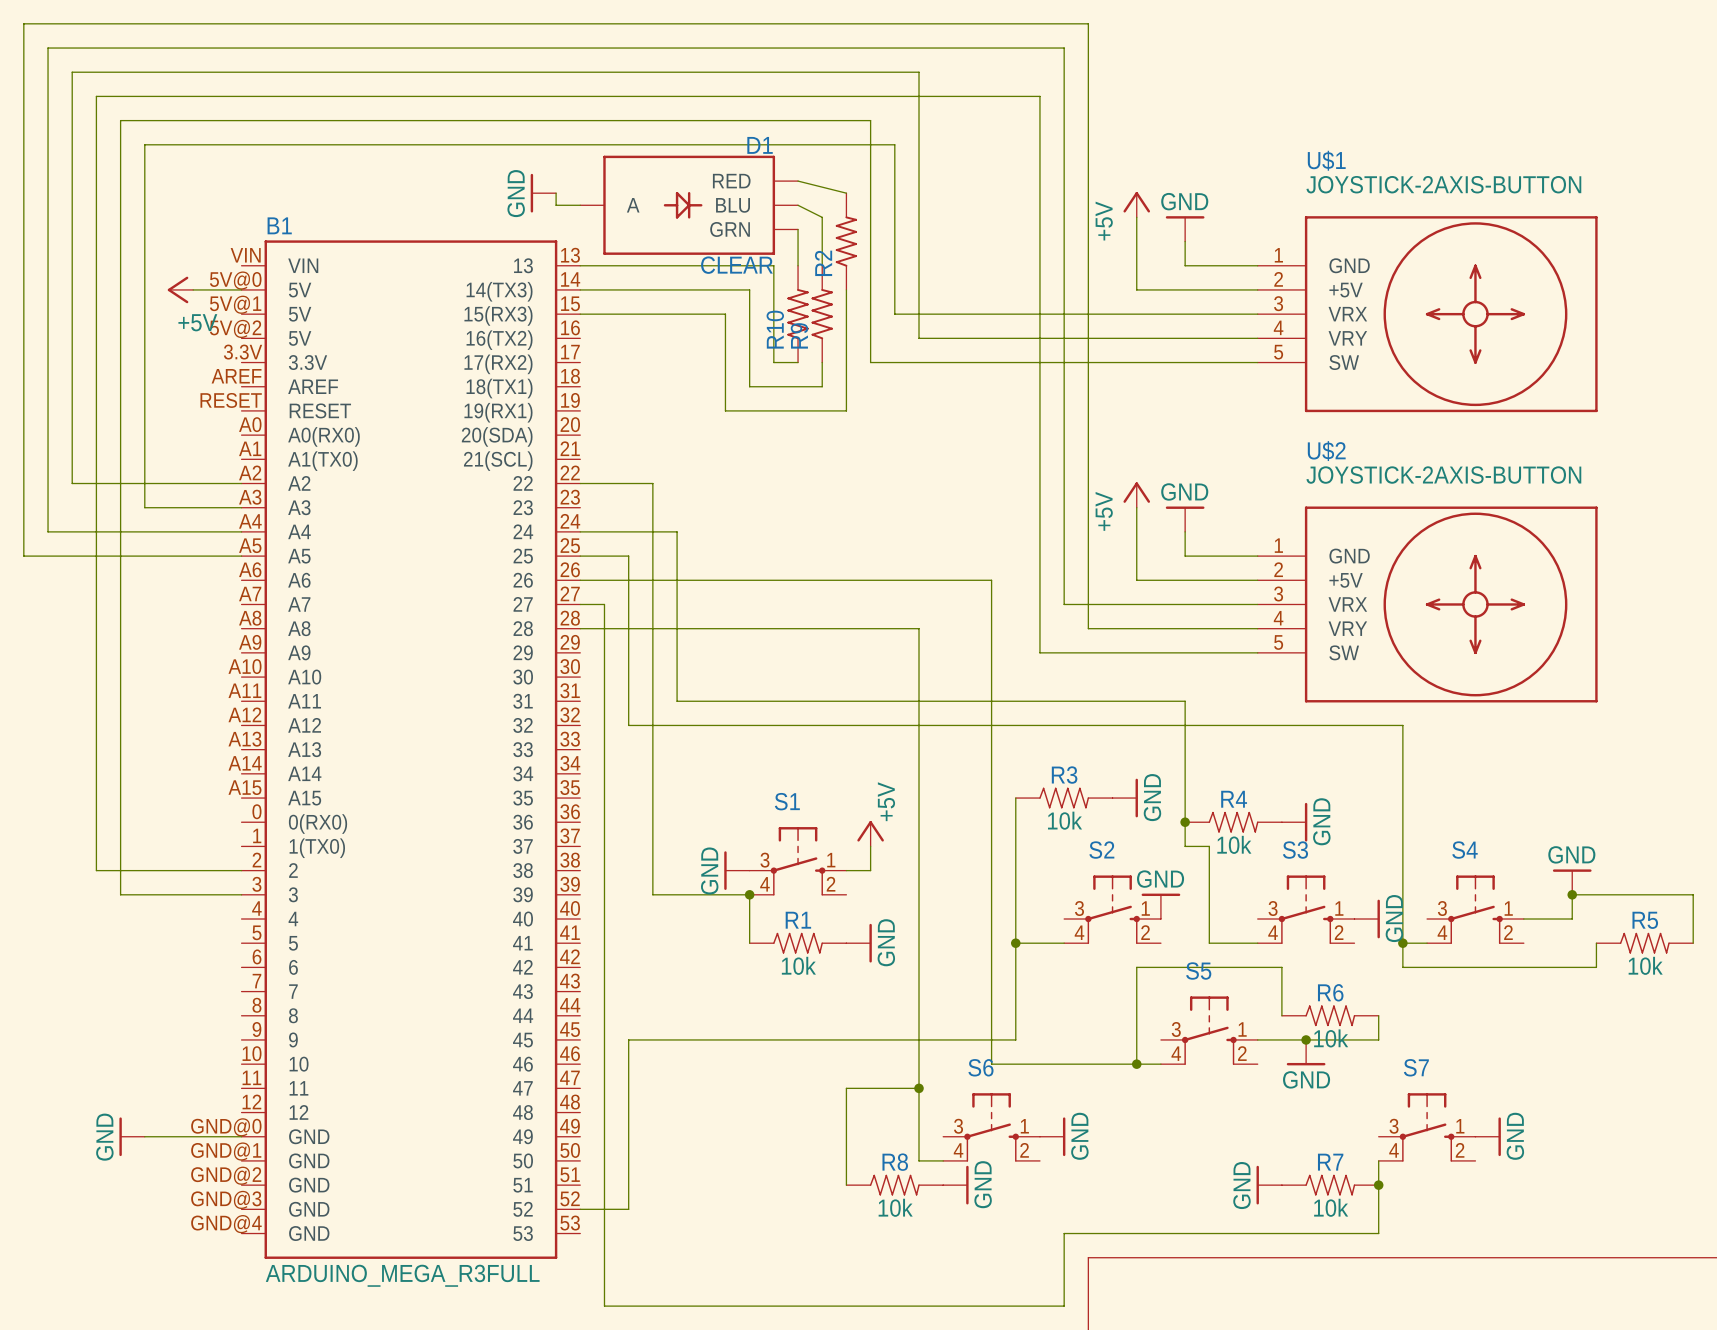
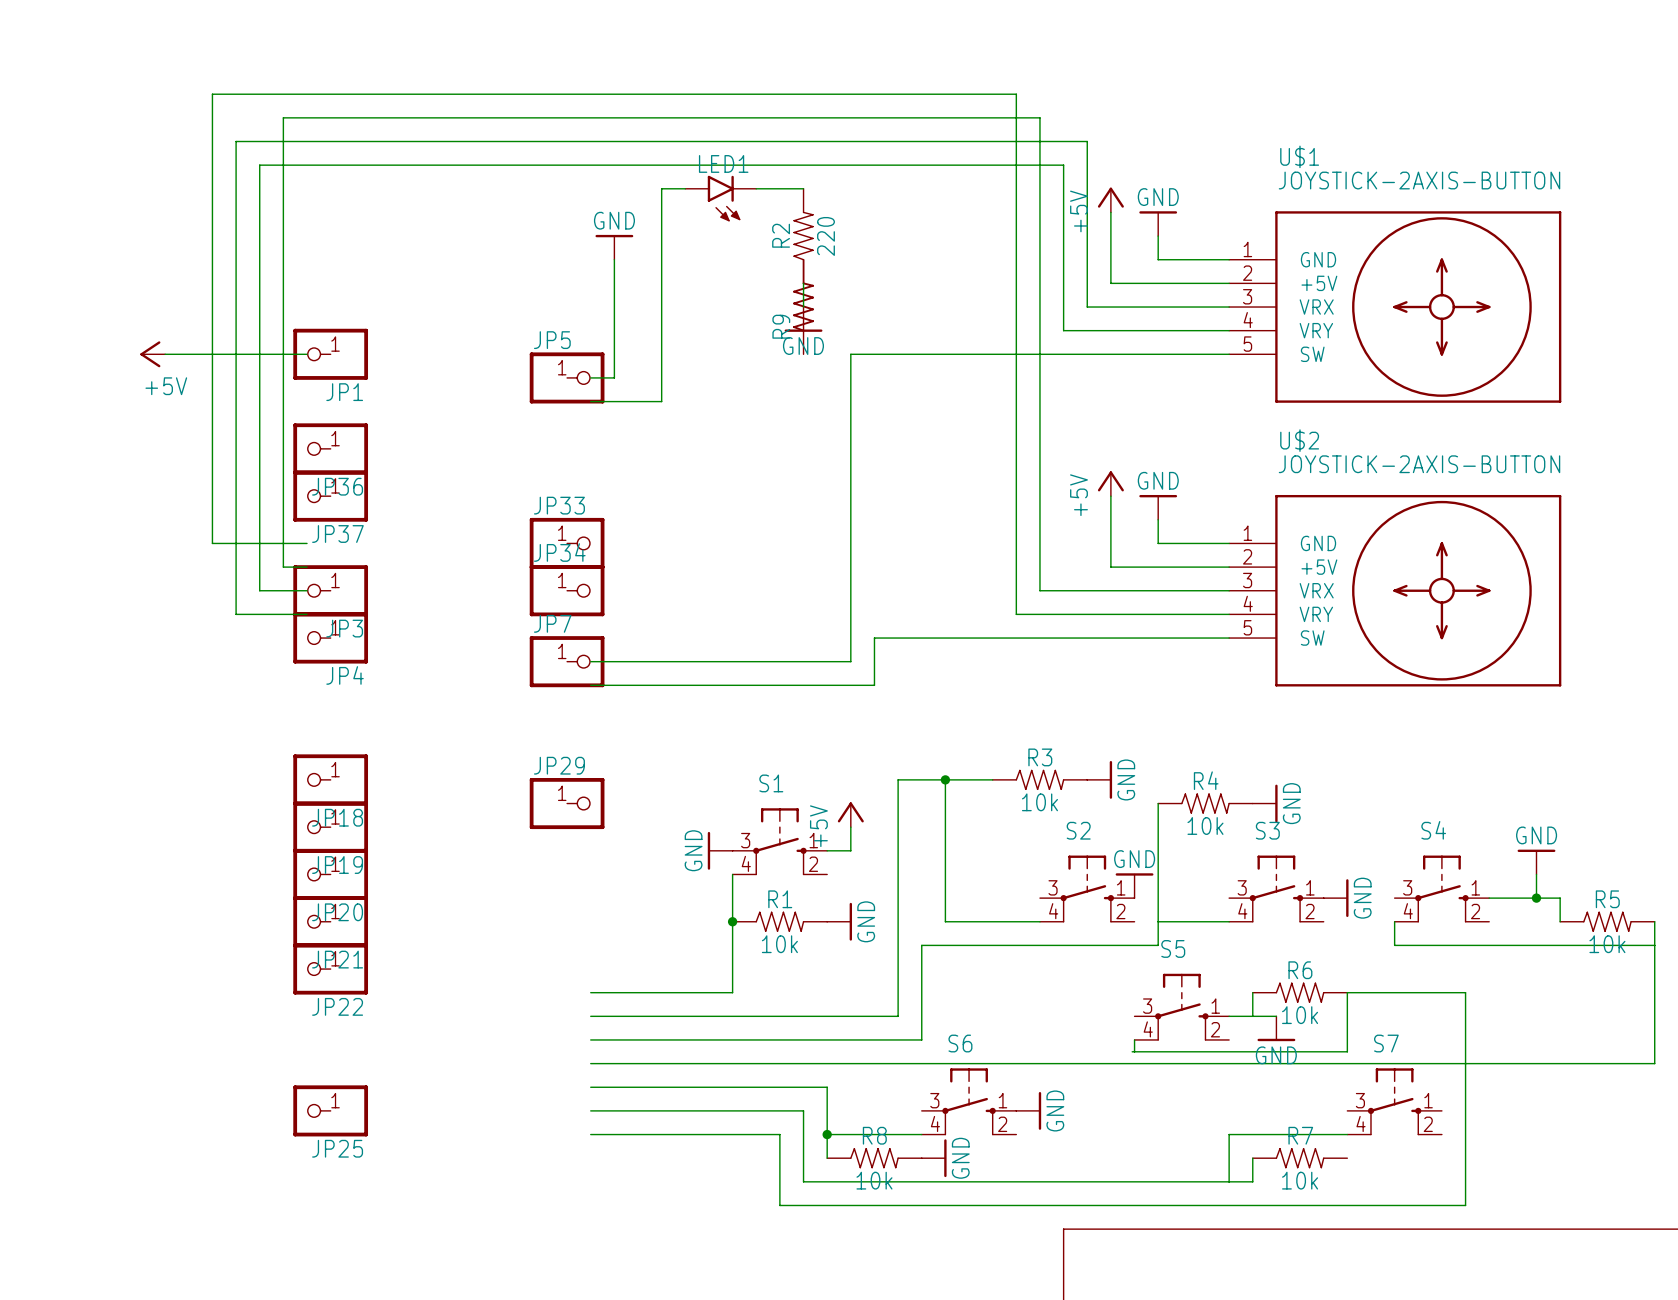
wire: (217, 96) (96, 96) (96, 870) (241, 870) -> (212, 94) (212, 543)
wire: (289, 120) (120, 120) (120, 894) (241, 894) -> (283, 117) (283, 567) (307, 567)
wire: (870, 120) (870, 362) -> (850, 117) (1039, 117)
wire: (1064, 120) (1064, 48) (48, 48) (48, 531) (241, 531) -> none
wire: (241, 144) (144, 144) (144, 507) (241, 507) -> (236, 141) (236, 614) (307, 614)
wire: (894, 144) (894, 314) (1112, 314) -> (874, 141) (1087, 141) (1087, 307)
wire: (1088, 168) (1088, 23) (23, 23) (23, 556) (217, 556) -> (1063, 165) (259, 165) (259, 590) (307, 590)
wire: (798, 181) (846, 193) -> none
power symbol rotation: 0° (531, 193) -> 90° clockwise (614, 236)
power symbol position: GND (543, 193) -> GND (614, 247)
wire: (556, 193) (556, 205) (580, 205) -> none
wire: none -> (685, 188) (661, 188) (661, 401) (590, 401)
wire: none -> (756, 188) (803, 188)
R2 symbol: [835, 193, 858, 290] -> [793, 188, 814, 284]
LED1: none -> (720, 198)
D1: CLEAR (689, 205) -> none
wire: (798, 205) (822, 217) (822, 265) -> none
wire: (798, 229) (798, 265) -> none
R2 value: none -> 220 (825, 236)
wire: (580, 265) (773, 265) (773, 362) (798, 362) -> none
wire: none -> (614, 259) (614, 377) (590, 377)
power symbol position: +5V (180, 289) -> +5V (152, 354)
wire: (193, 289) (241, 289) -> none
wire: (580, 289) (749, 289) (749, 386) (822, 386) (822, 362) -> none
wire: none -> (803, 283) (803, 307)
wire: (846, 289) (846, 410) (725, 410) (725, 314) (580, 314) -> none
R10: (798, 314) -> none
power symbol: none -> GND (803, 319)
wire: none -> (165, 354) (307, 354)
JP1: none -> (330, 354)
wire: none -> (850, 354) (850, 661) (590, 661)
JP5: none -> (567, 377)
JP36: none -> (330, 448)
wire: (241, 483) (72, 483) (72, 72) (919, 72) (919, 338) (1088, 338) (1088, 628) -> none
wire: (580, 483) (652, 483) (652, 894) (749, 894) -> none
JP37: none -> (330, 496)
wire: (580, 531) (677, 531) (677, 701) -> (590, 685) (661, 685)
wire: none -> (236, 543) (307, 543)
wire: (580, 556) (628, 556) (628, 725) (1402, 725) (1402, 967) (1427, 967) -> none
JP33: none -> (567, 543)
wire: (580, 580) (991, 580) (991, 1064) (1160, 1064) -> (1134, 1051) (1134, 1039)
JP3: none -> (330, 590)
wire: (580, 604) (604, 604) (604, 1306) (1064, 1306) (1064, 1233) -> (590, 1134) (779, 1134) (779, 1205) (1039, 1205)
JP34: none -> (567, 590)
wire: (580, 628) (919, 628) (919, 798) -> none
wire: (1039, 628) (1039, 652) -> (1016, 614) (1063, 614)
JP4: none -> (330, 638)
JP7: none -> (567, 661)
wire: (894, 701) (1185, 701) (1185, 822) -> (874, 685) (874, 638) (1016, 638)
B1: ARDUINO_MEGA_R3FULL (410, 749) -> none
JP18: none -> (330, 779)
wire: none -> (945, 779) (945, 921) (992, 921)
junction: none -> (945, 779)
wire: (1015, 798) (1015, 1039) (919, 1039) (919, 1160) -> (992, 779) (898, 779)
power symbol text position: +5V (886, 801) -> +5V (818, 826)
JP29: none -> (567, 803)
junction: (1185, 822) -> none
JP19: none -> (330, 827)
wire: (1185, 846) (1209, 846) (1209, 943) -> (1158, 827) (1158, 945)
JP20: none -> (330, 874)
junction position: (749, 894) -> (732, 921)
wire: (1572, 894) (1693, 894) (1693, 943) -> (898, 1063) (1654, 1063) (1654, 921)
junction position: (1572, 894) -> (1536, 898)
JP21: none -> (330, 921)
wire: none -> (732, 921) (732, 992) (590, 992)
junction: (1015, 943) -> none
wire: none -> (1158, 921) (1181, 921)
wire: (1402, 943) (1427, 943) -> (1394, 945) (1394, 921)
junction: (1402, 943) -> none
wire: (1596, 943) (1596, 967) -> (1560, 921) (1560, 898) (1536, 898)
wire: (1136, 967) (1136, 1064) -> (1110, 945) (921, 945) (921, 1039) (590, 1039)
wire: (1185, 967) (1281, 967) (1281, 1015) -> (1252, 1016) (1252, 992)
wire: none -> (1560, 945) (1654, 945)
JP22: none -> (330, 969)
wire: none -> (1347, 992) (1465, 992) (1465, 1205) (1347, 1205)
wire: (628, 1039) (628, 1209) (580, 1209) -> (614, 1016) (590, 1016)
wire: (1306, 1039) (1378, 1039) -> (1132, 1051) (1347, 1051) (1347, 1016)
junction: (1306, 1039) -> none
junction: (1136, 1064) -> none
wire: (846, 1088) (846, 1112) -> (827, 1063) (590, 1063)
junction: (919, 1088) -> none
wire: none -> (590, 1087) (827, 1087)
power symbol: GND (132, 1136) -> none
wire: (144, 1136) (241, 1136) -> none
JP25: none -> (330, 1110)
wire: none -> (590, 1110) (803, 1110) (803, 1181) (1252, 1181) (1252, 1158)
power symbol: GND (1488, 1136) -> none
wire: none -> (827, 1134) (898, 1134)
junction: none -> (827, 1134)
wire: (1378, 1160) (1378, 1233) -> (1347, 1134) (1229, 1134) (1229, 1181)
power symbol: GND (1269, 1185) -> none
junction: (1378, 1185) -> none

